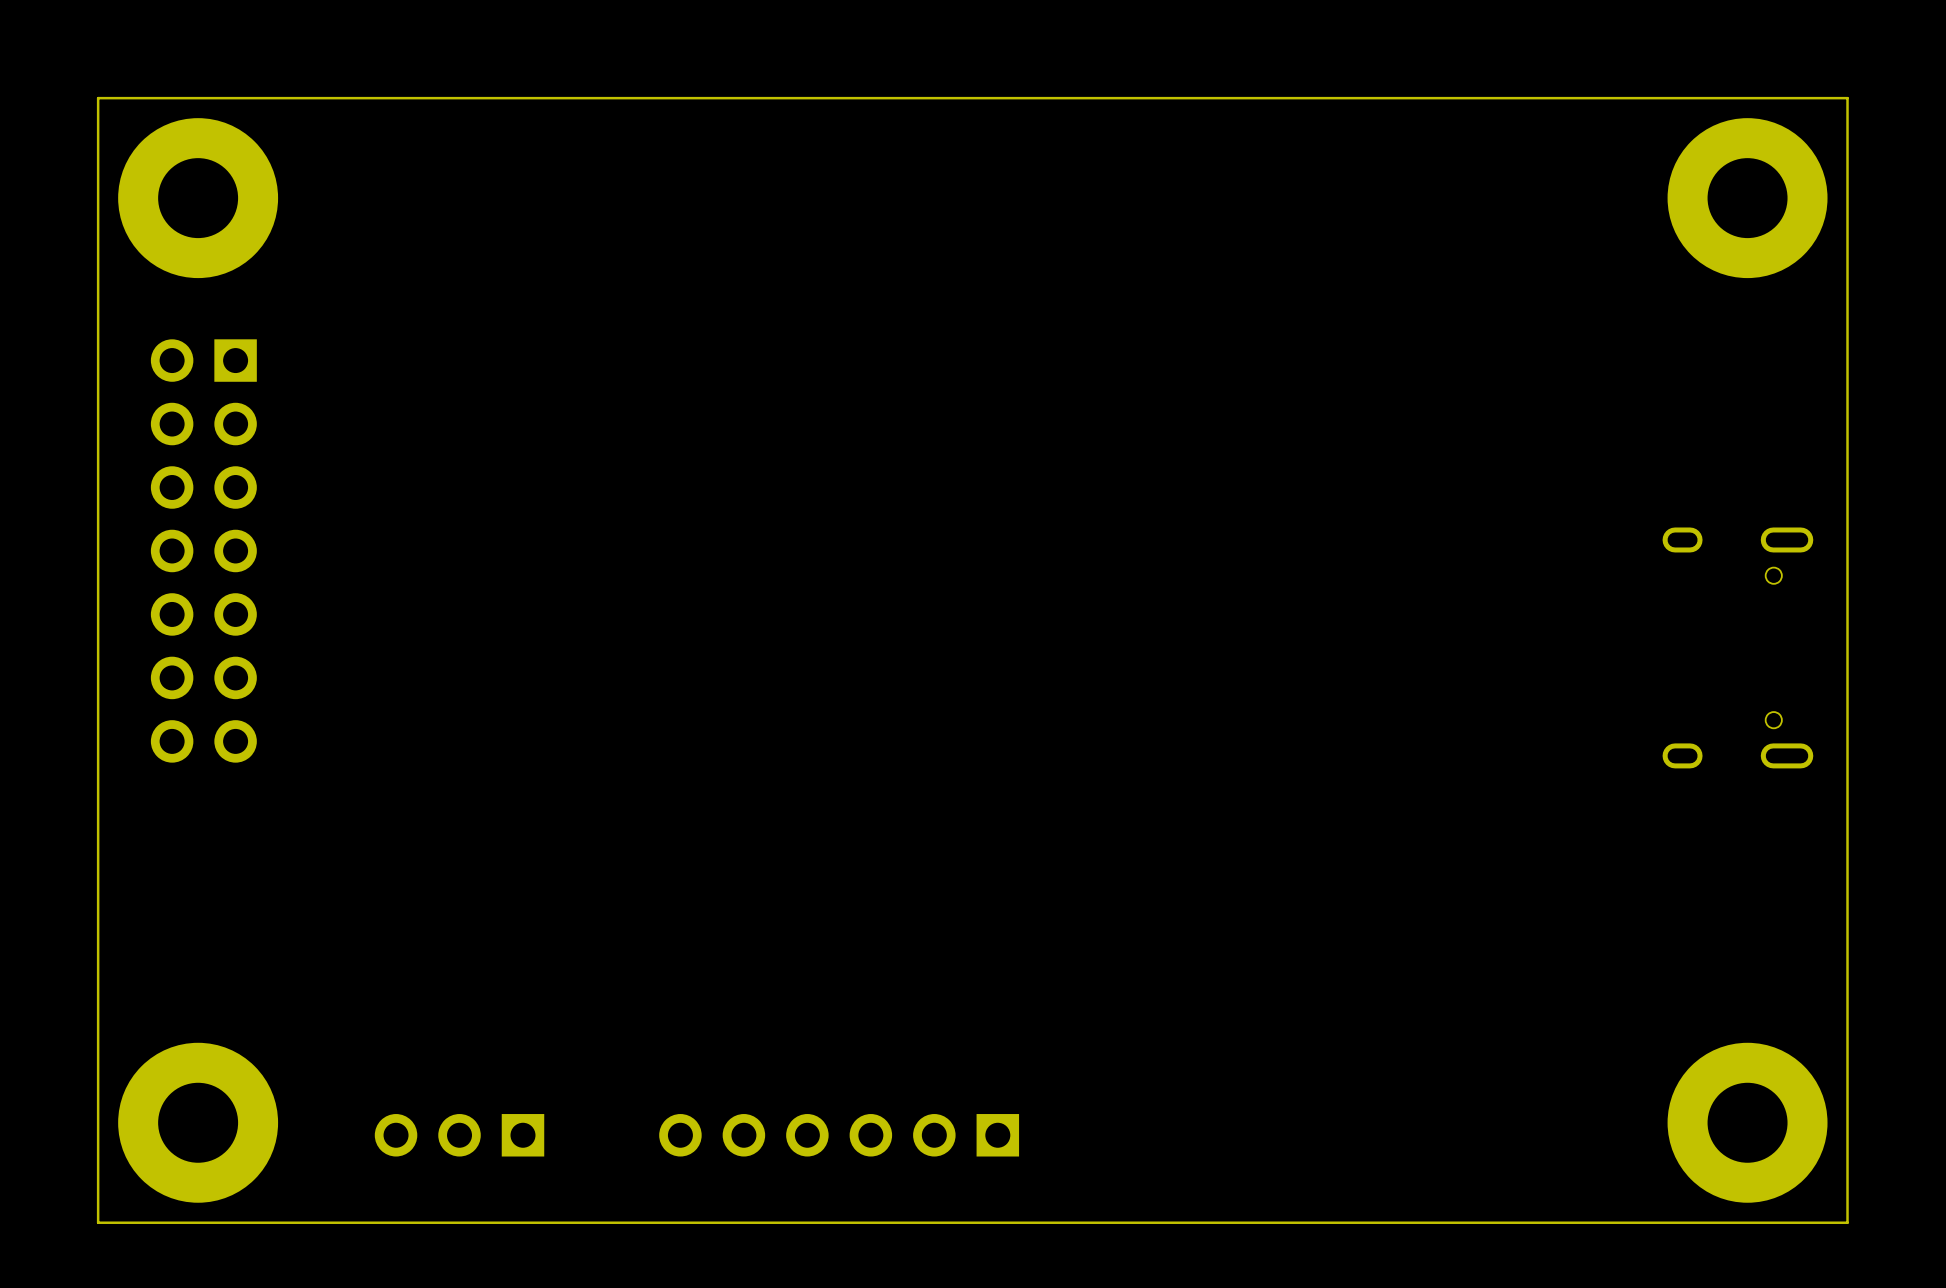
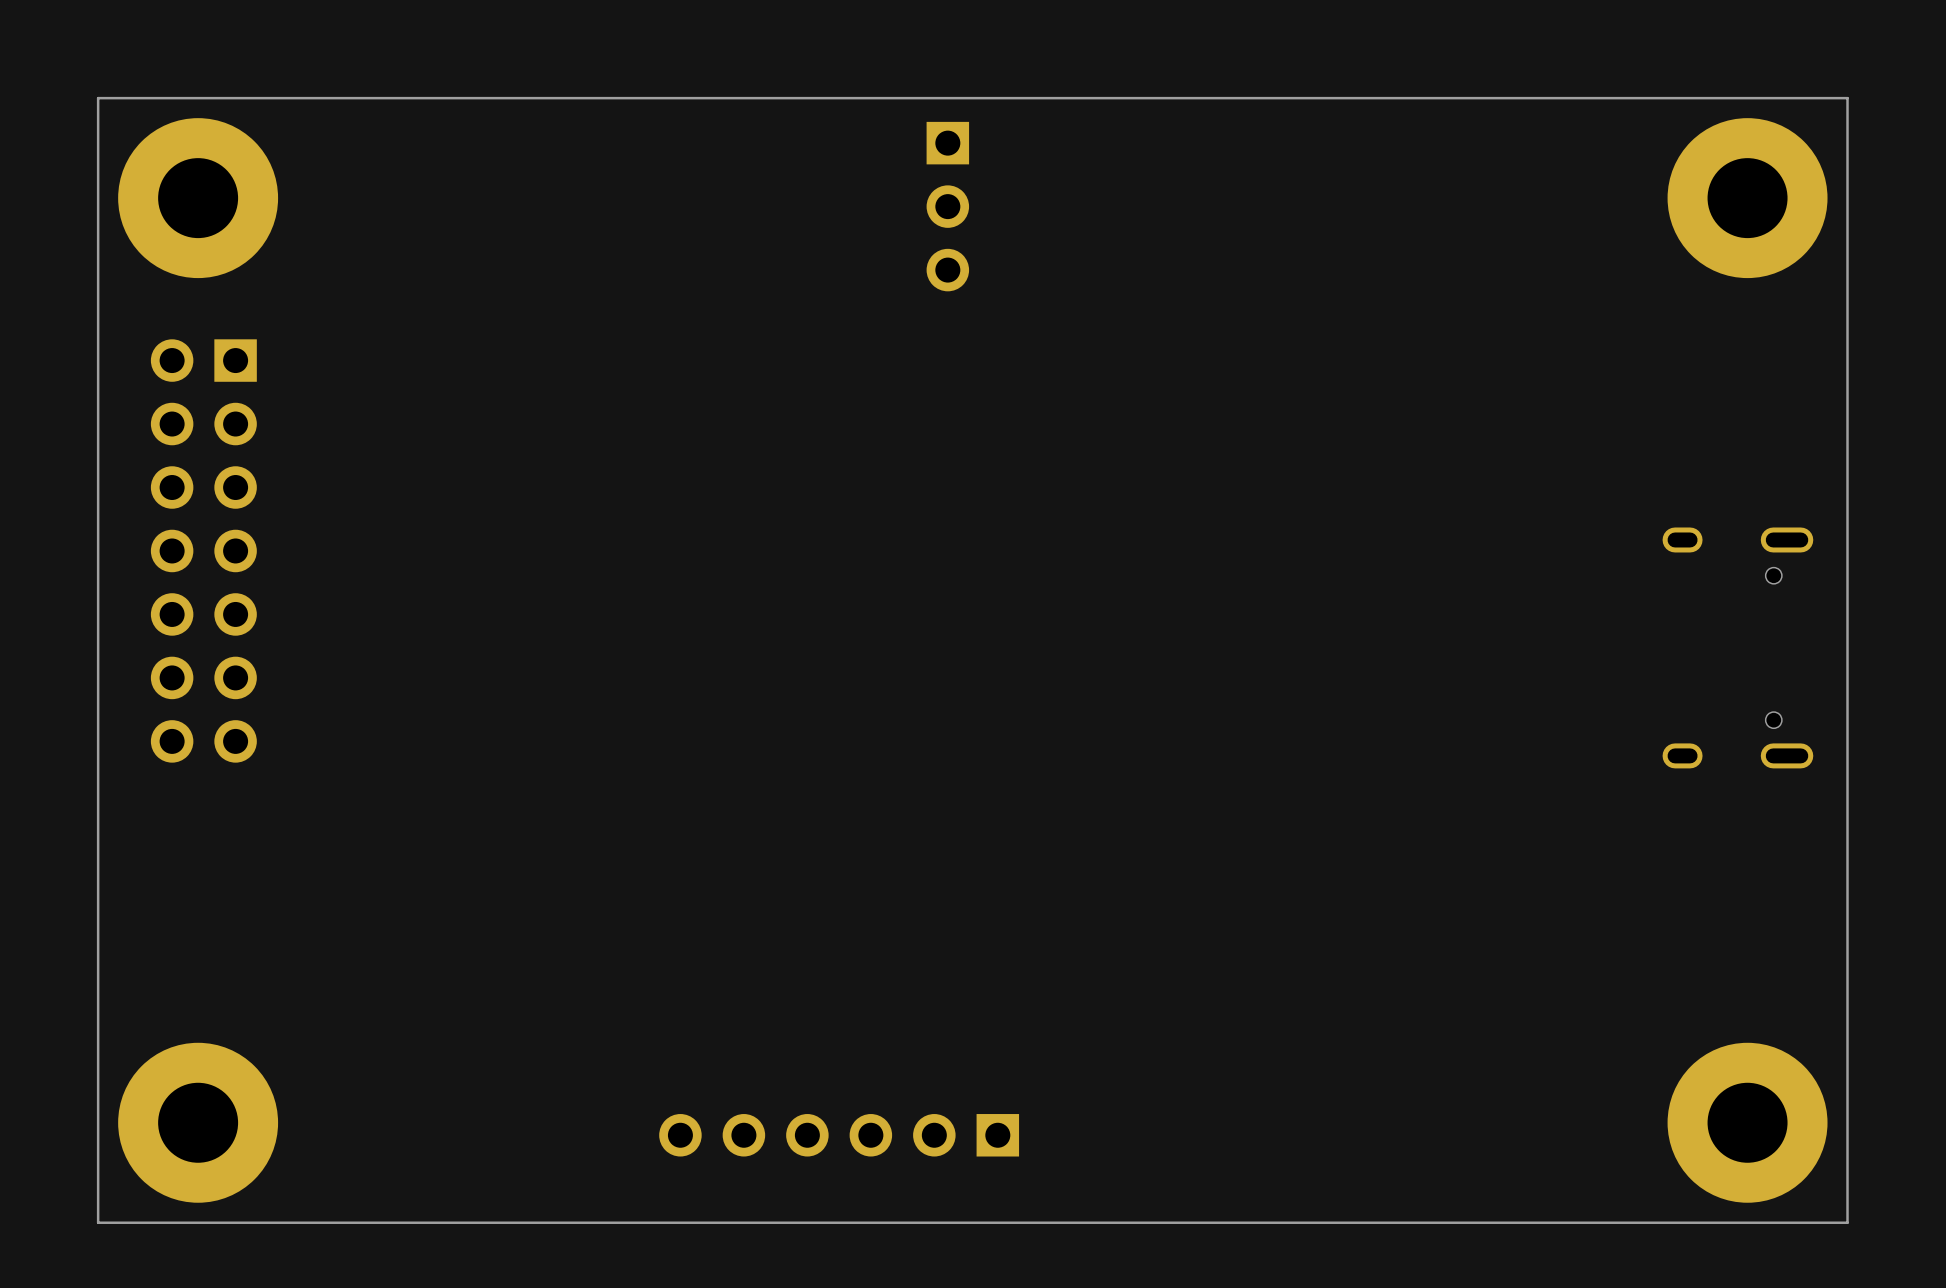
part: none -> (947, 206)
part: (459, 1135) -> none

